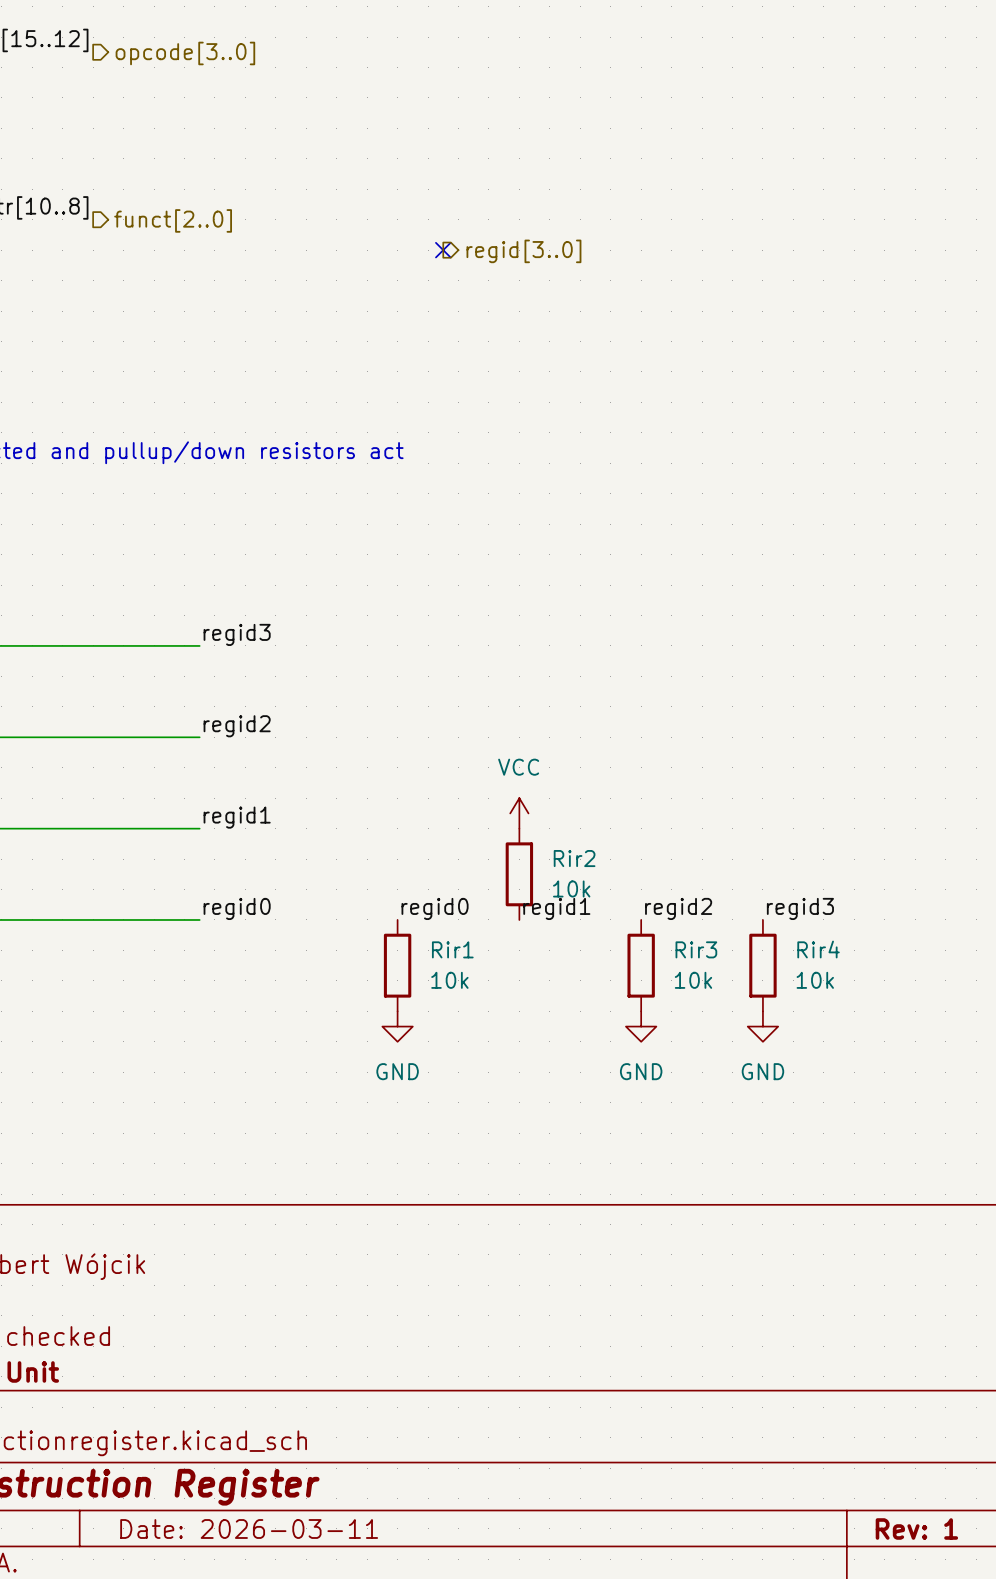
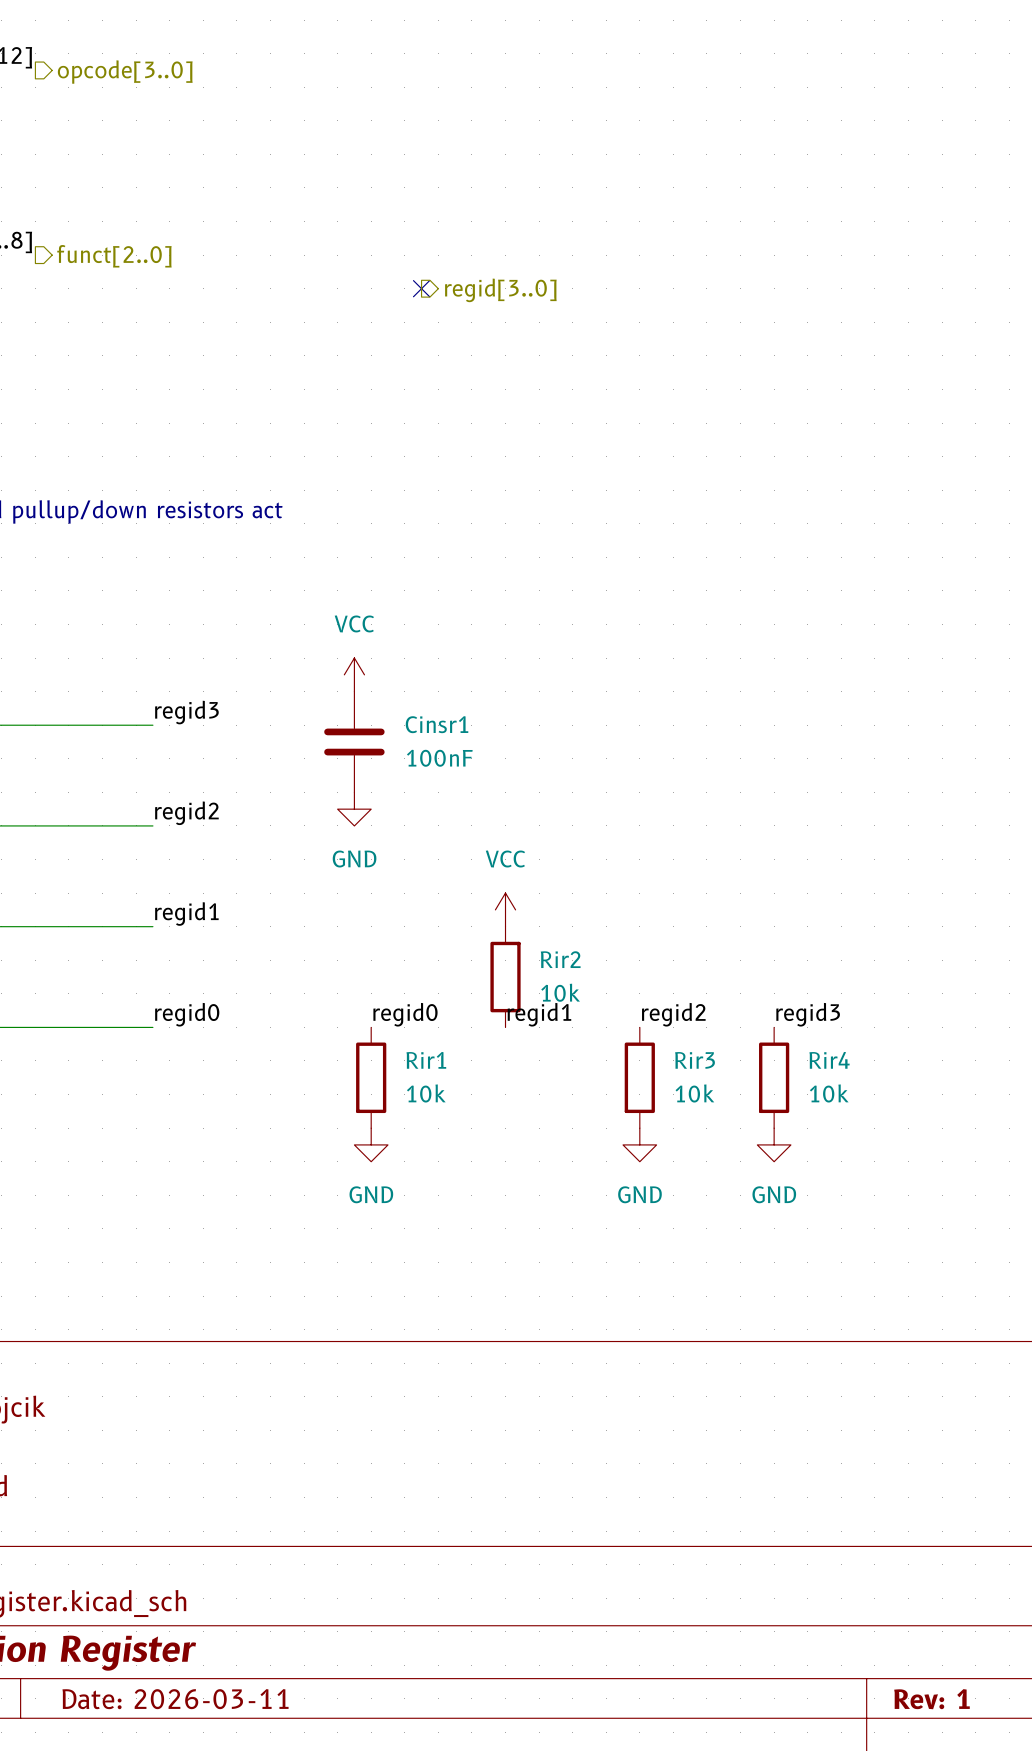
power symbol: none -> VCC (354, 674)
Cinsr1: none -> 100nF (354, 742)
power symbol: none -> GND (354, 809)

